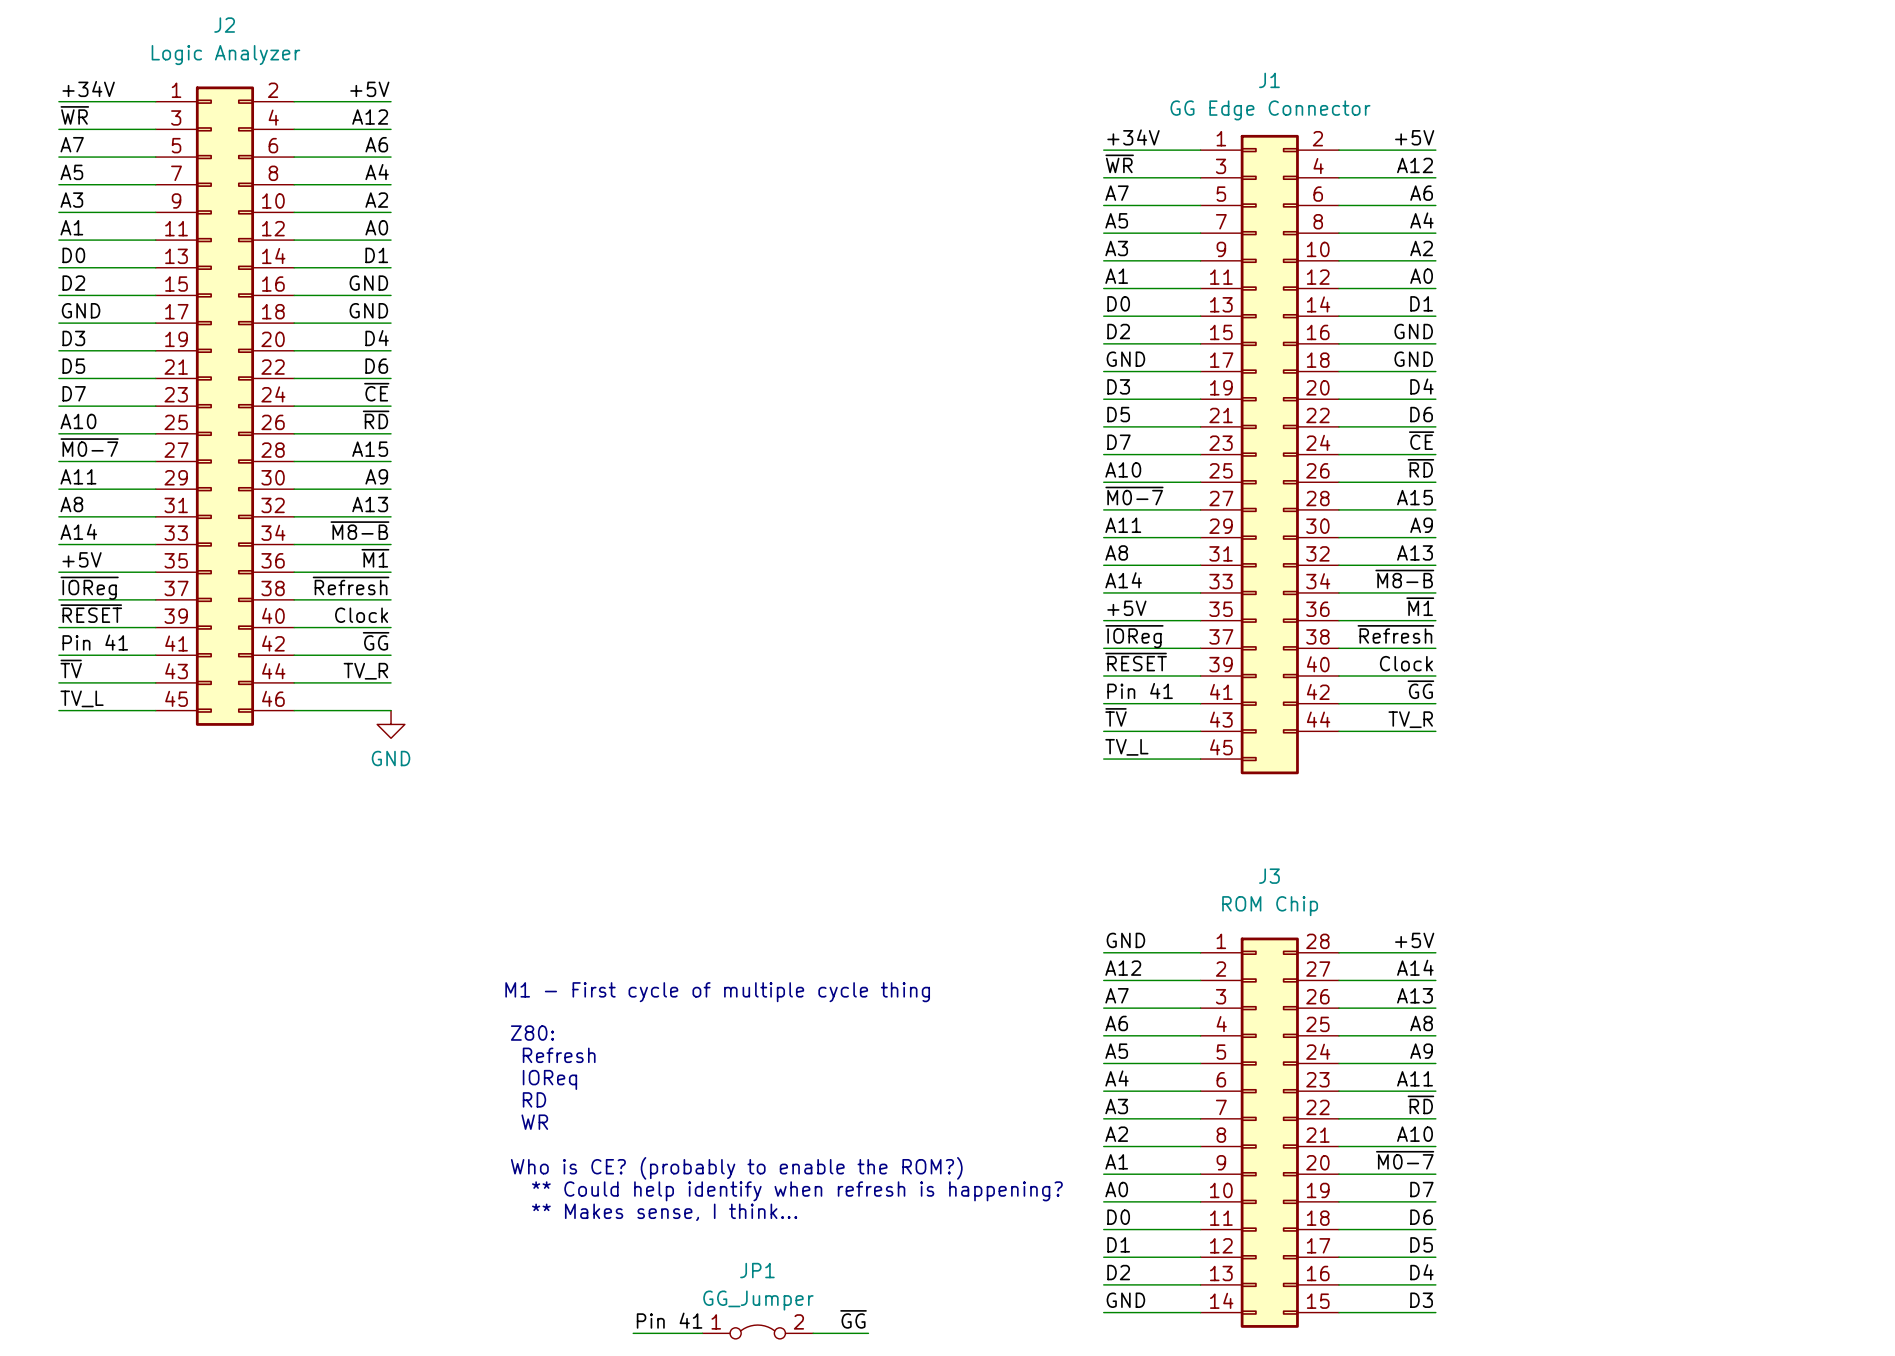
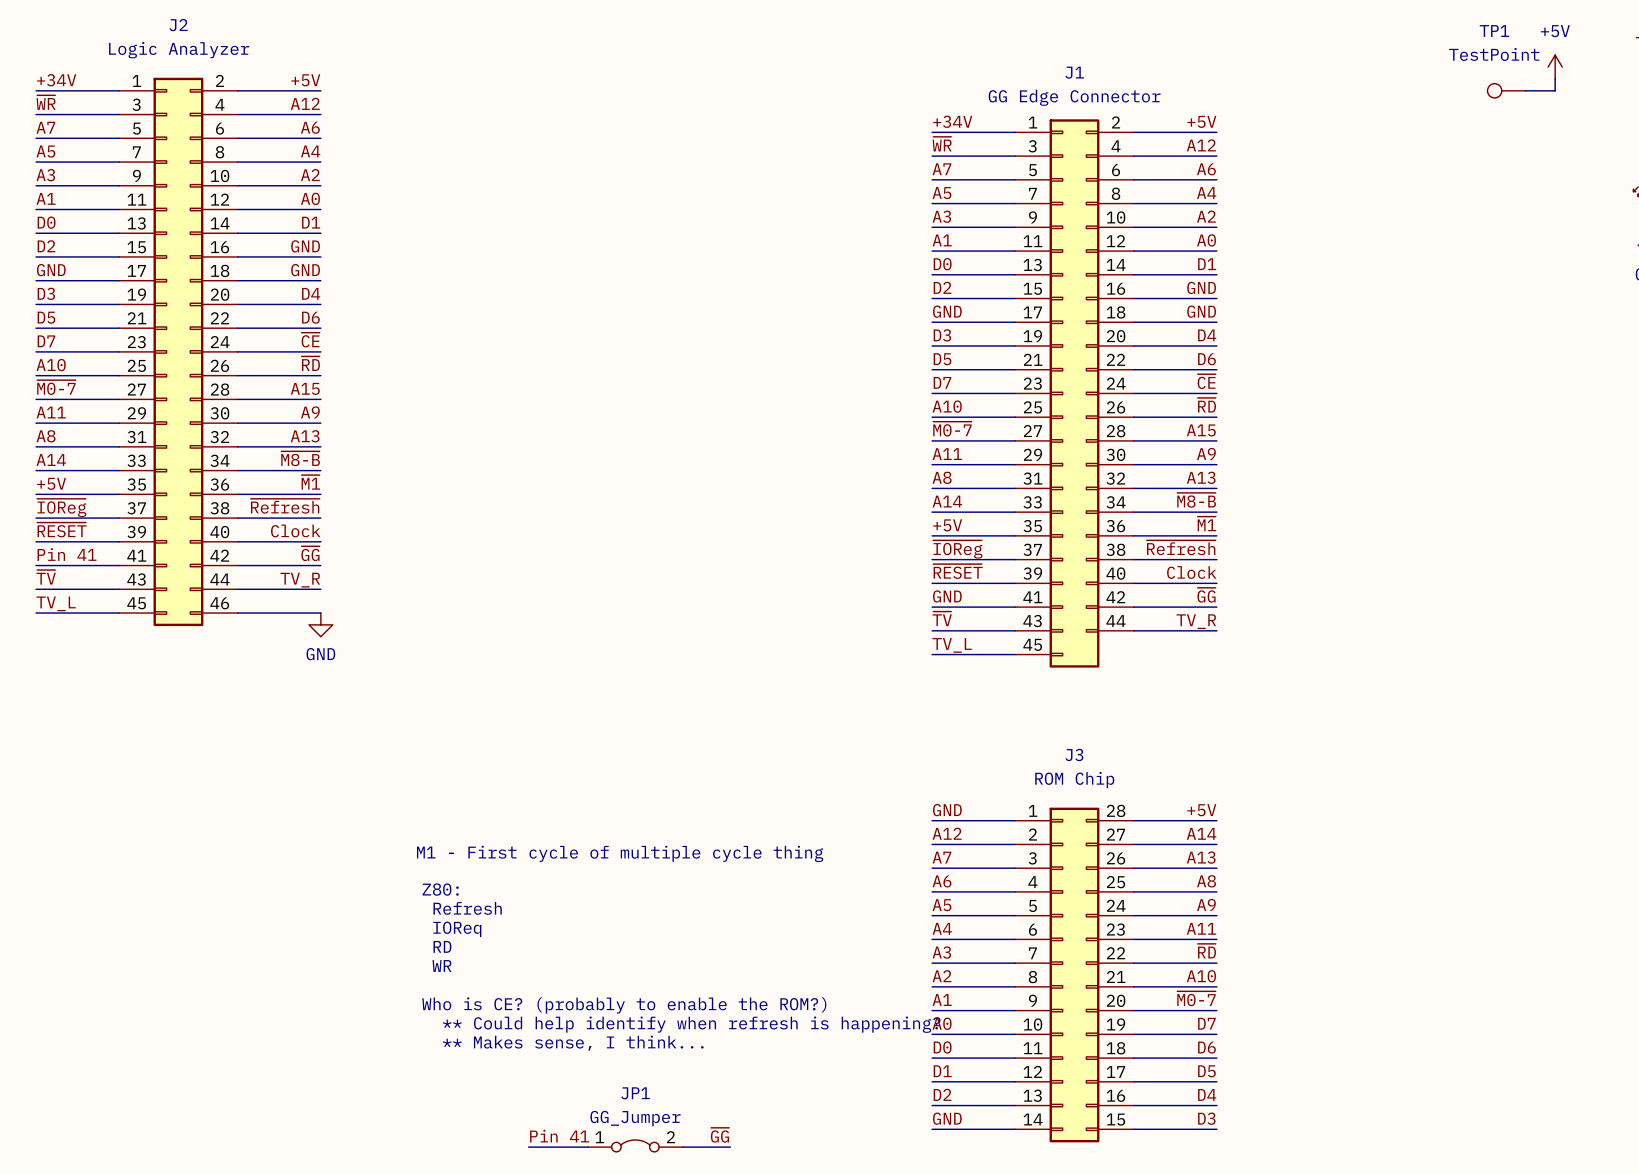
power symbol: none -> +5V (1555, 67)
wire: none -> (1555, 78) (1555, 90) (1525, 90)
TP1: none -> TestPoint (1506, 90)
label: Pin 41 (1140, 691) -> GND (947, 596)

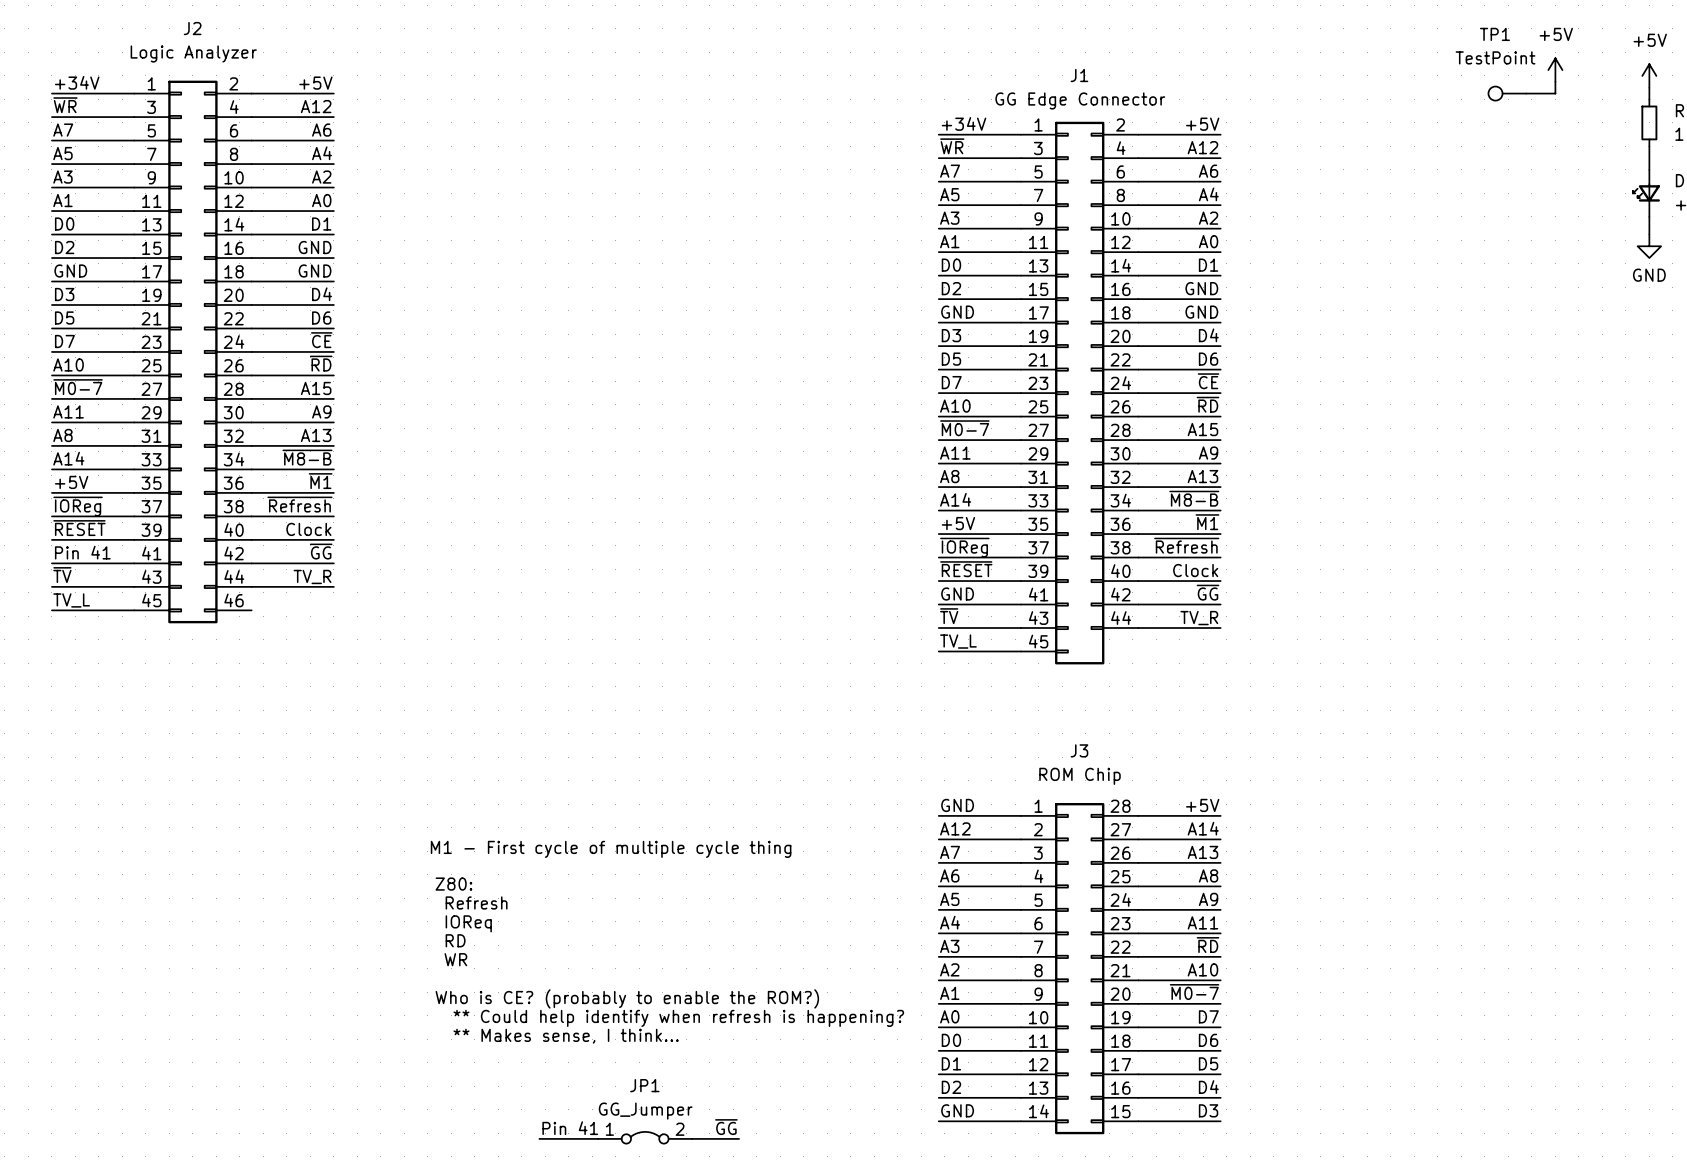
wire: (237, 613) (320, 613) -> none
power symbol: GND (320, 624) -> none

